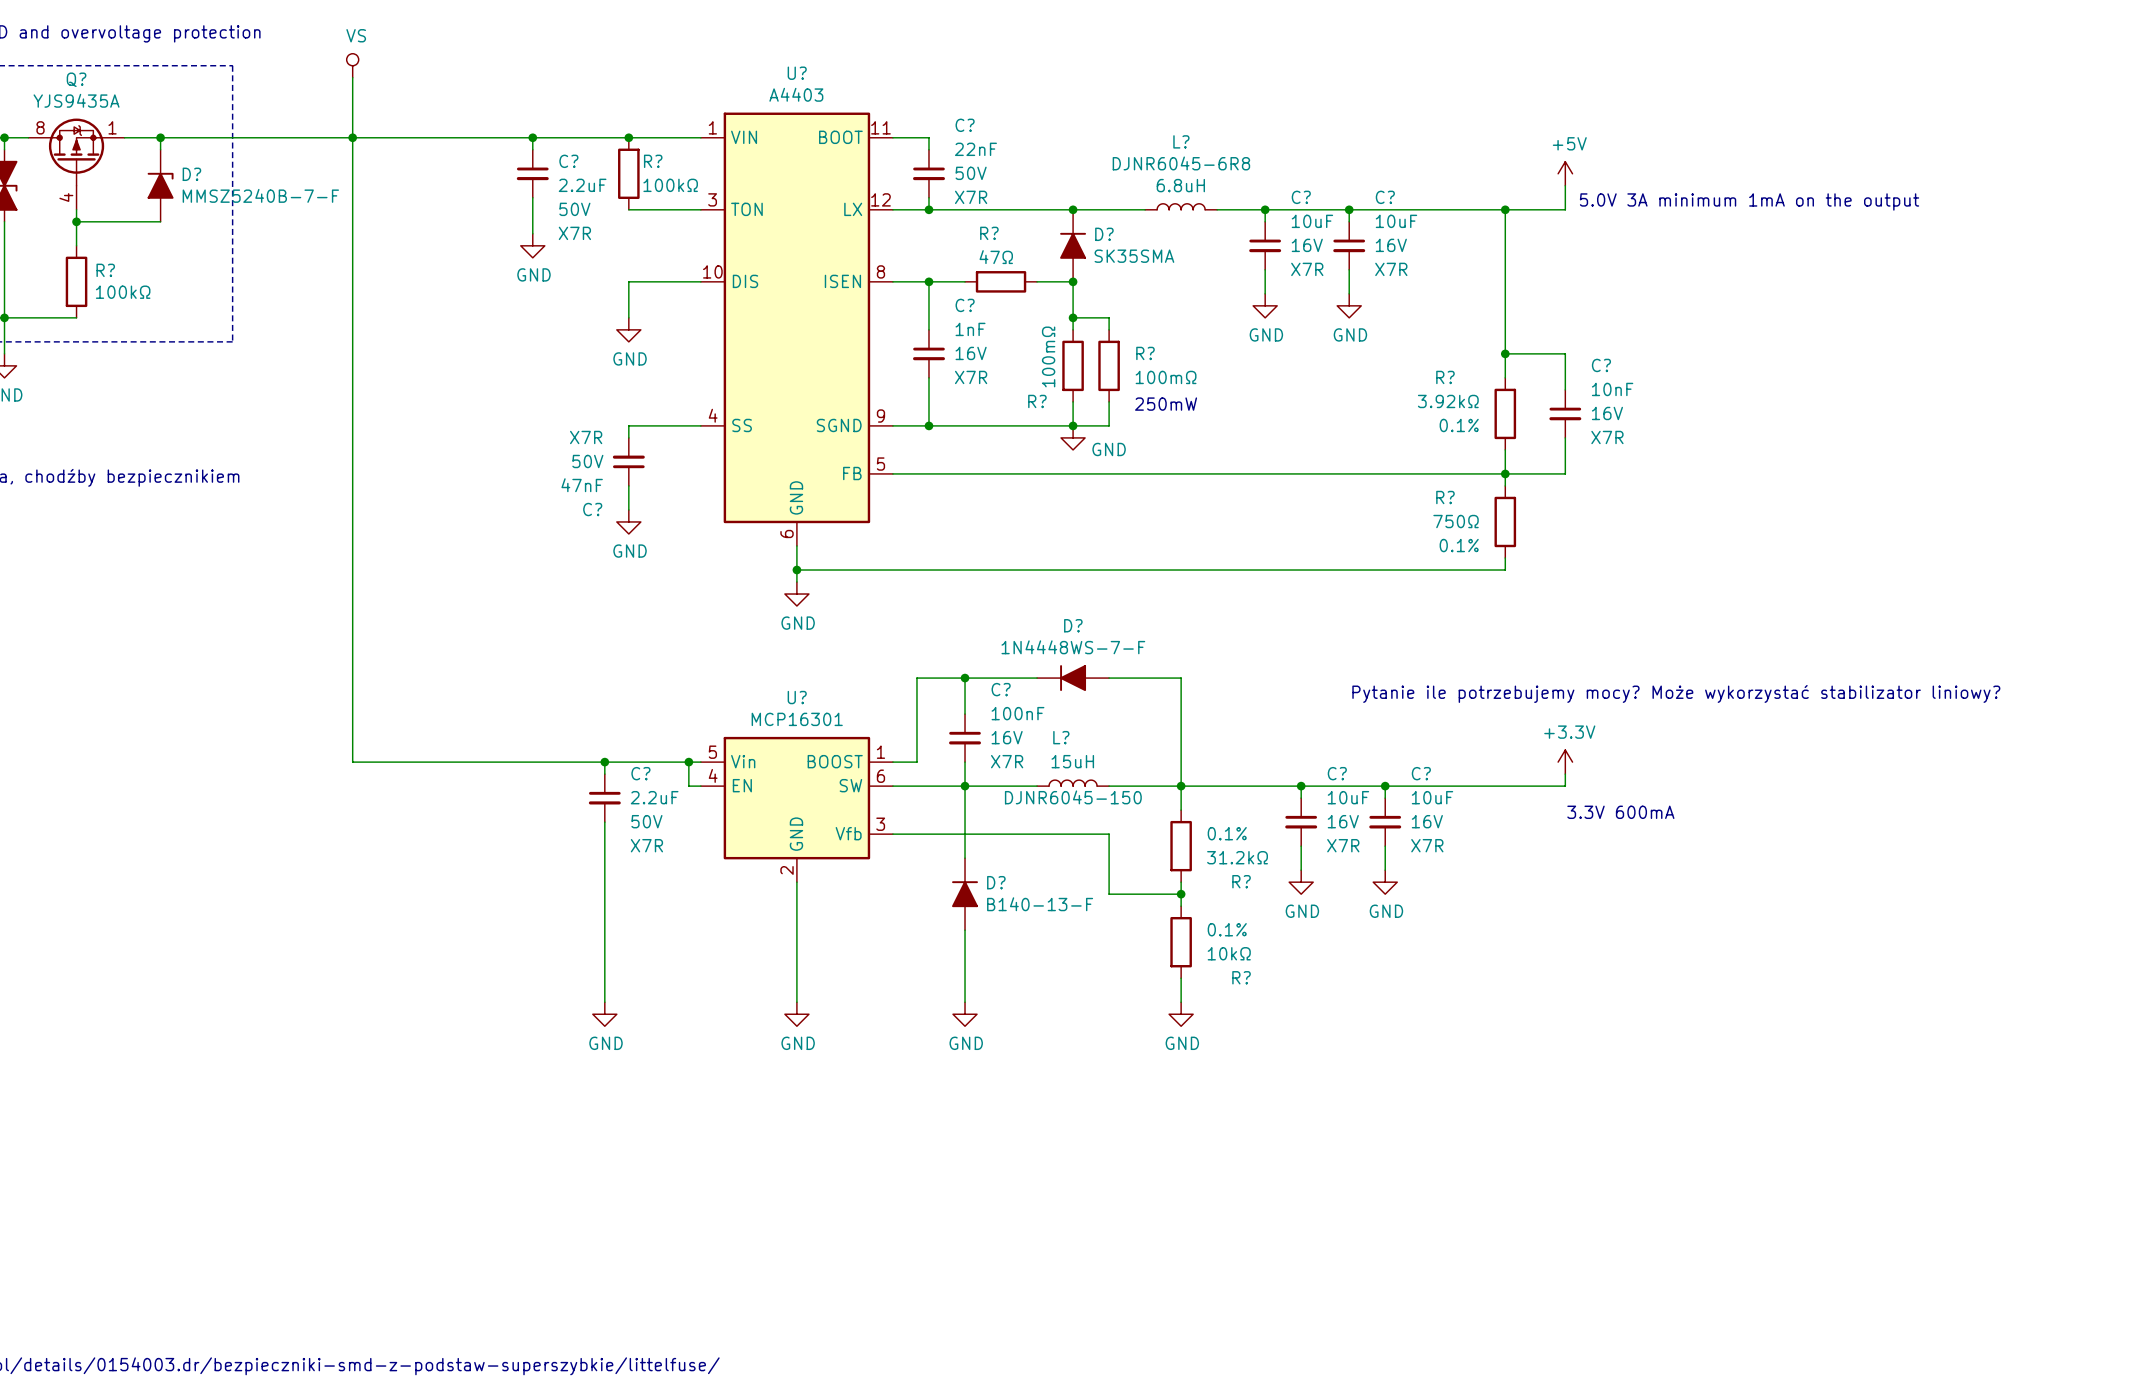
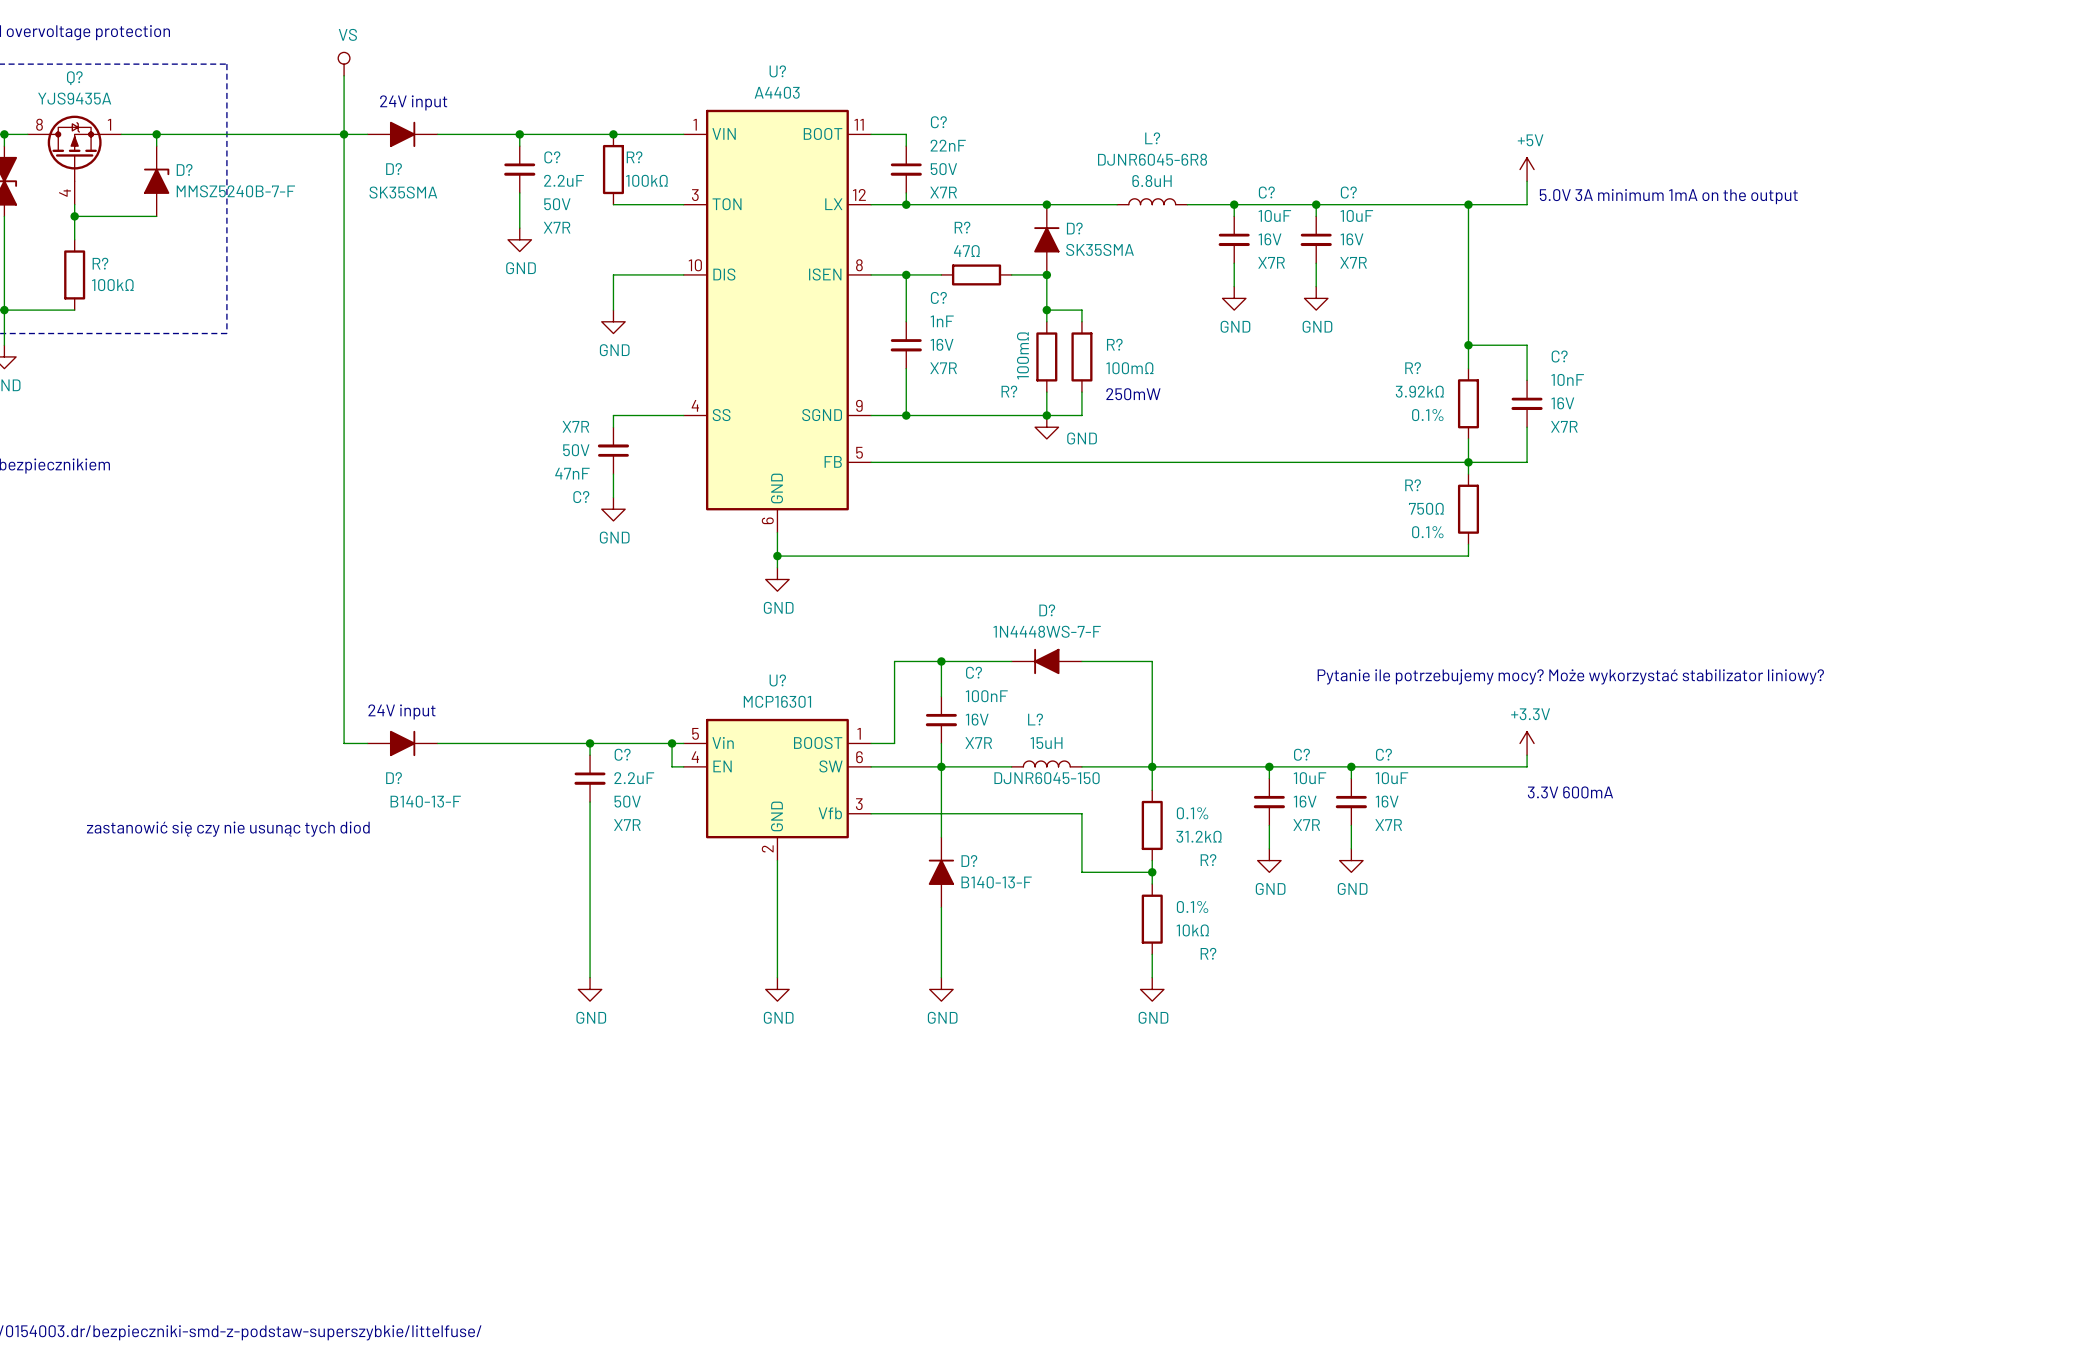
text: none -> 24V input (413, 102)
D?: none -> SK35SMA (402, 134)
text: none -> 24V input (401, 711)
D?: none -> B140-13-F (402, 743)
text: none -> zastanowić się czy nie usunąc tych diod (228, 829)

